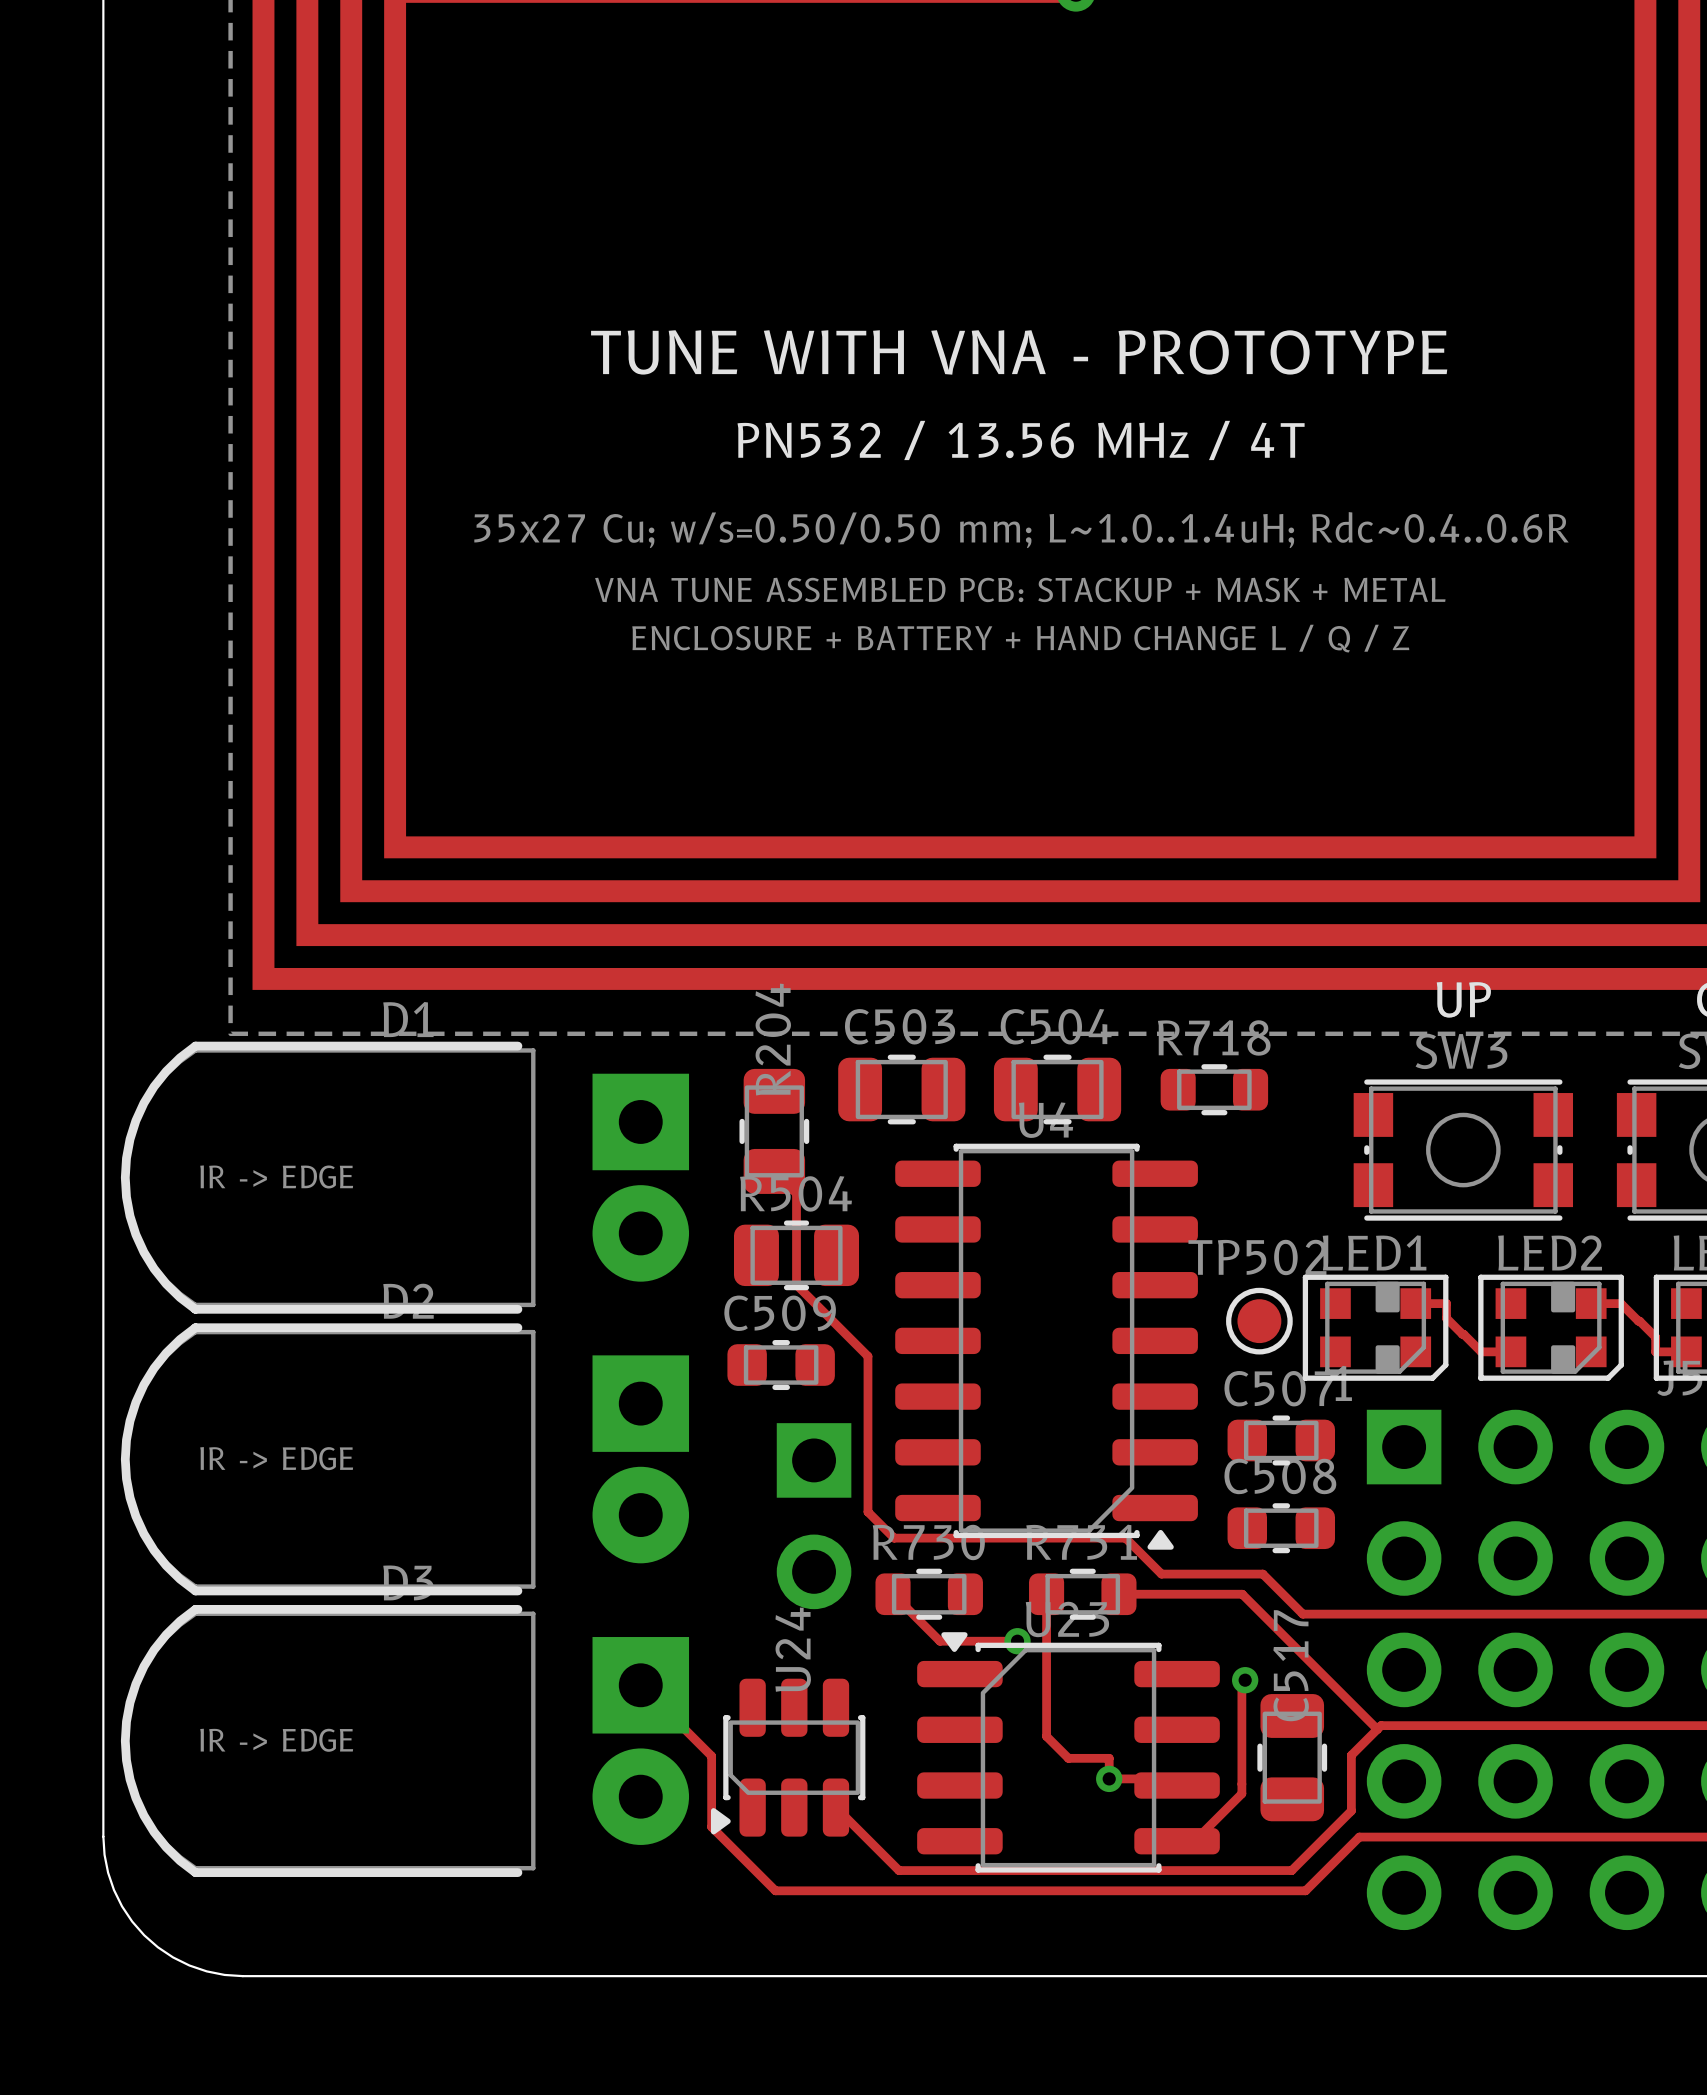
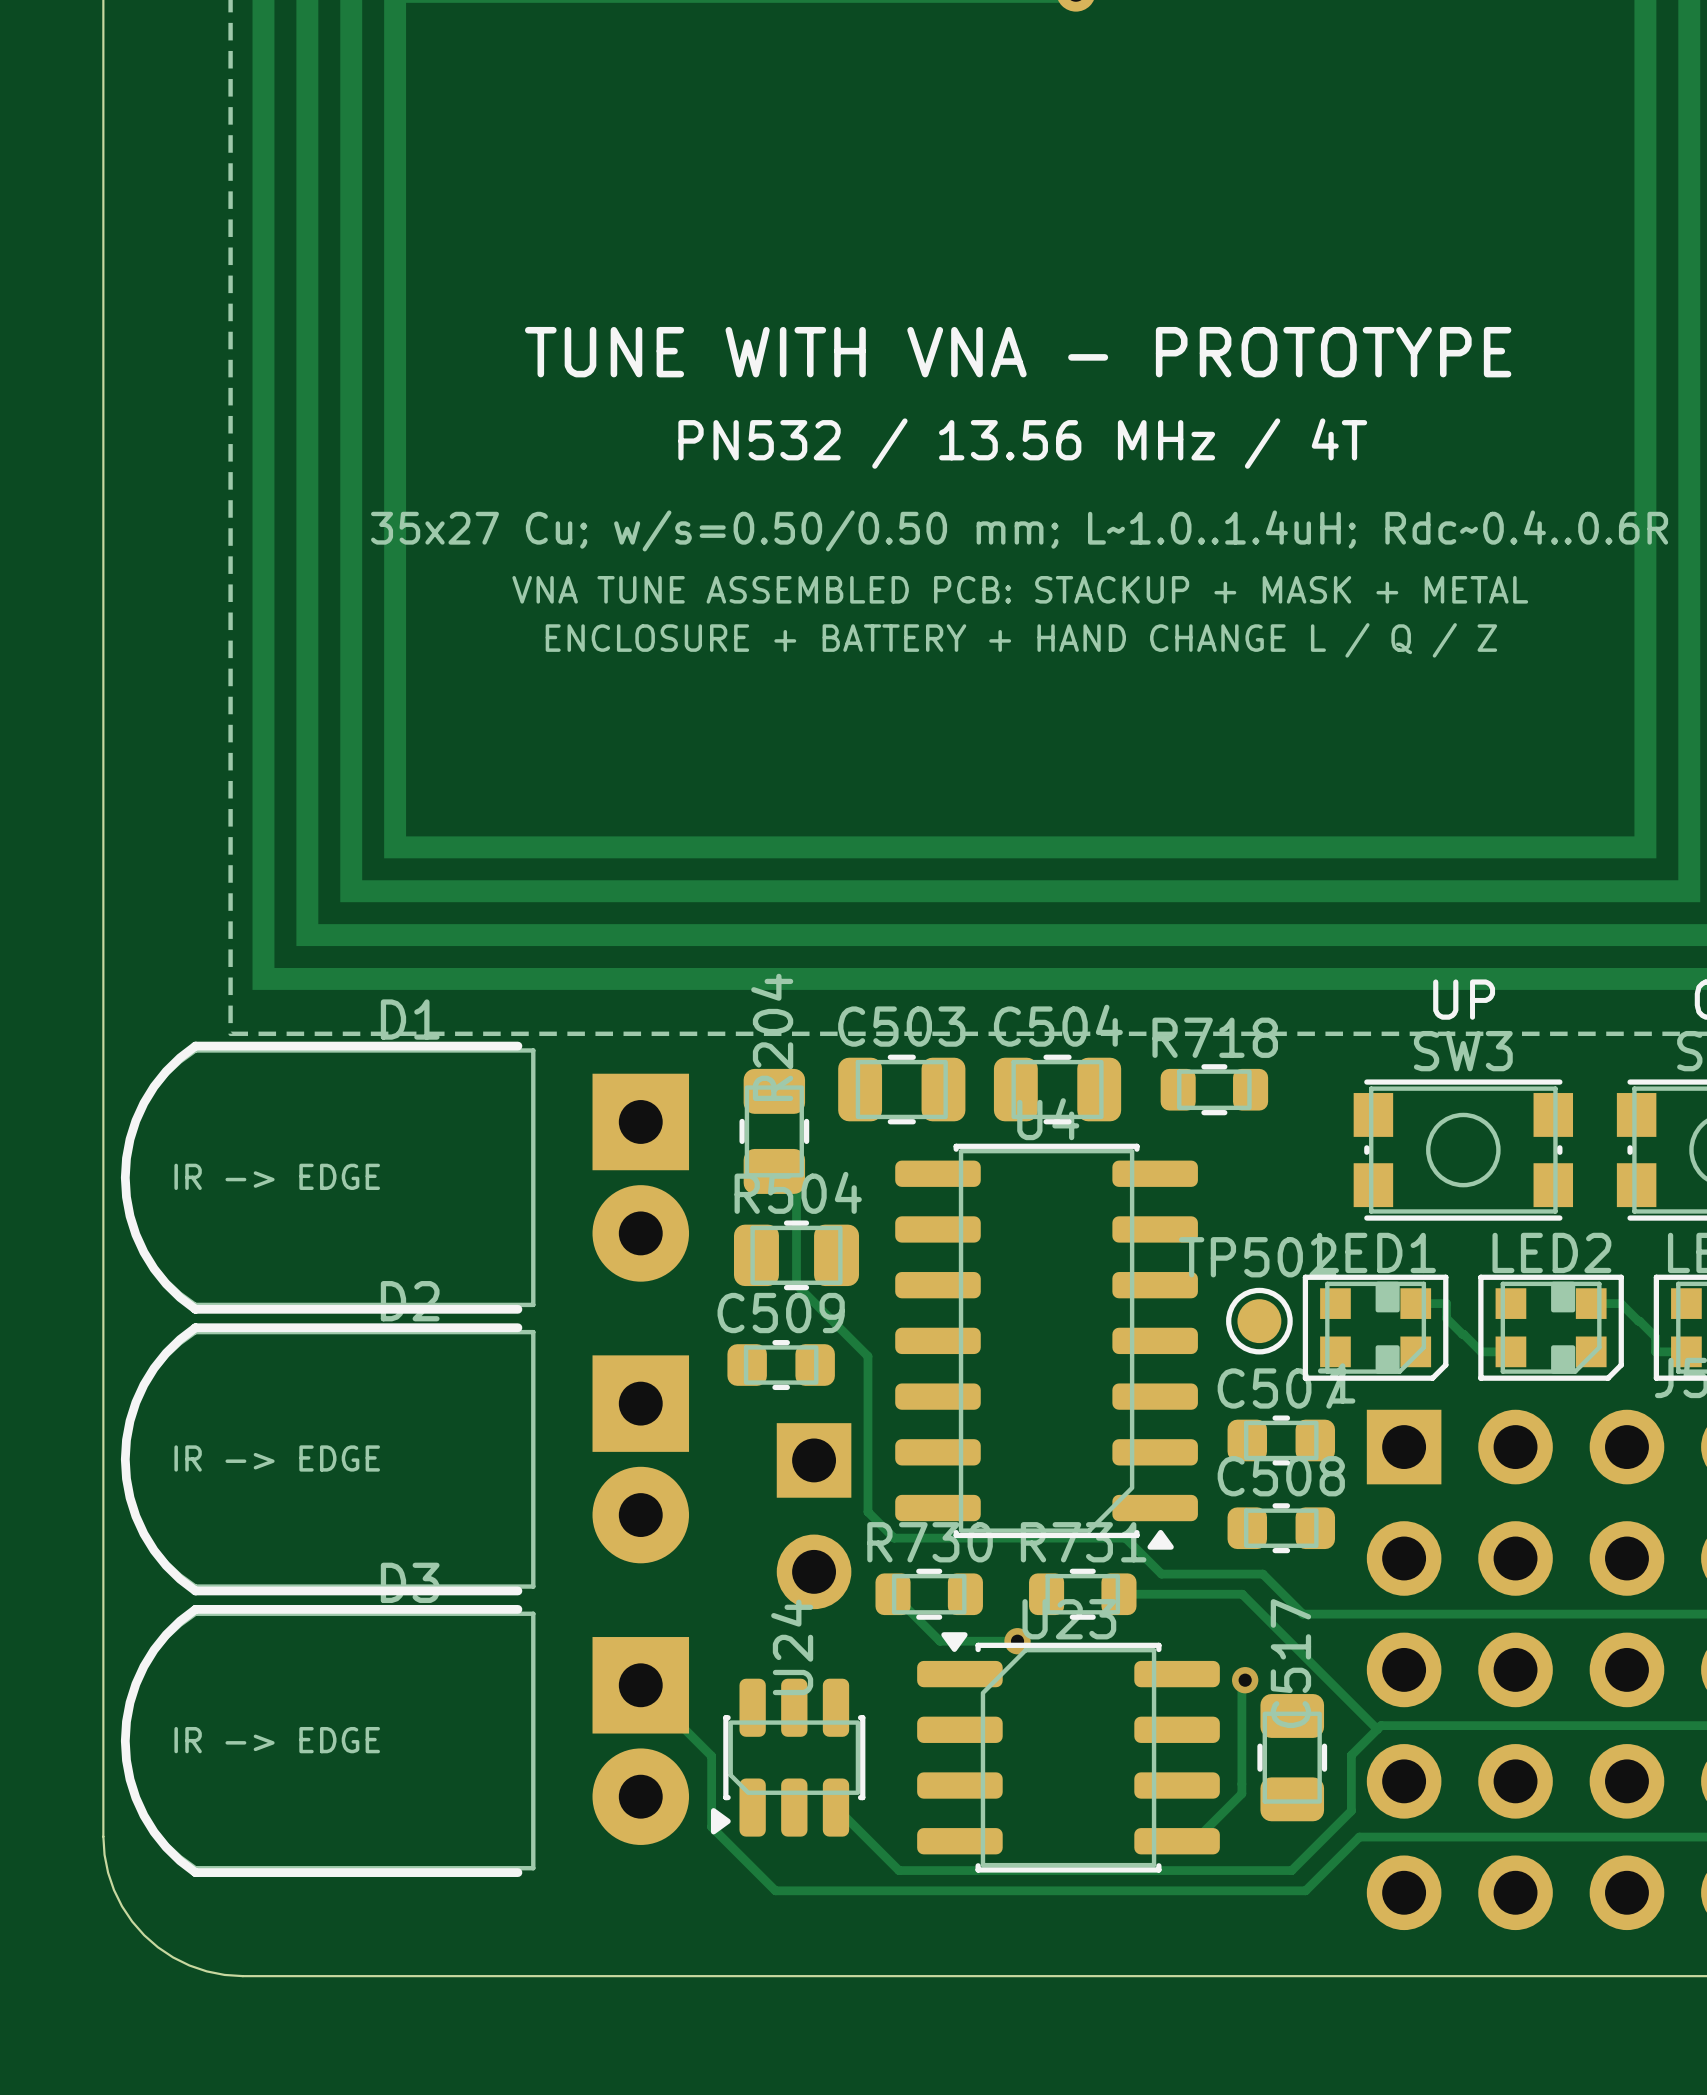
track: (1046, 1594) (1046, 1736) (1068, 1758) (1109, 1758) (1109, 1778) (1170, 1778) (1177, 1785) -> none
via: (1109, 1778) -> none

